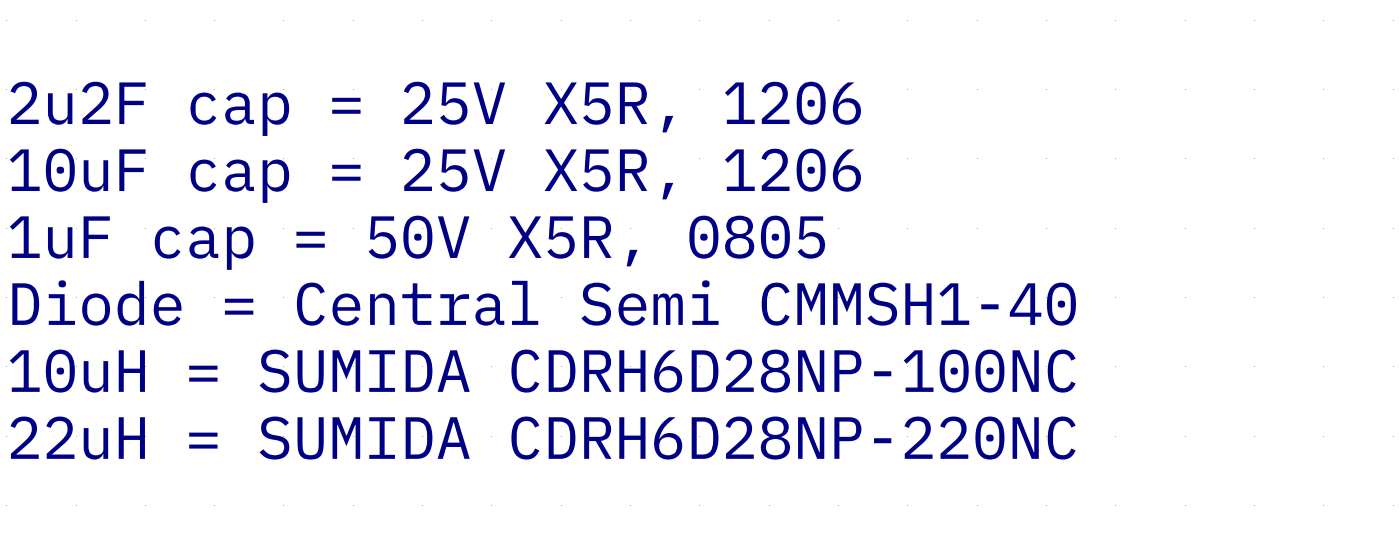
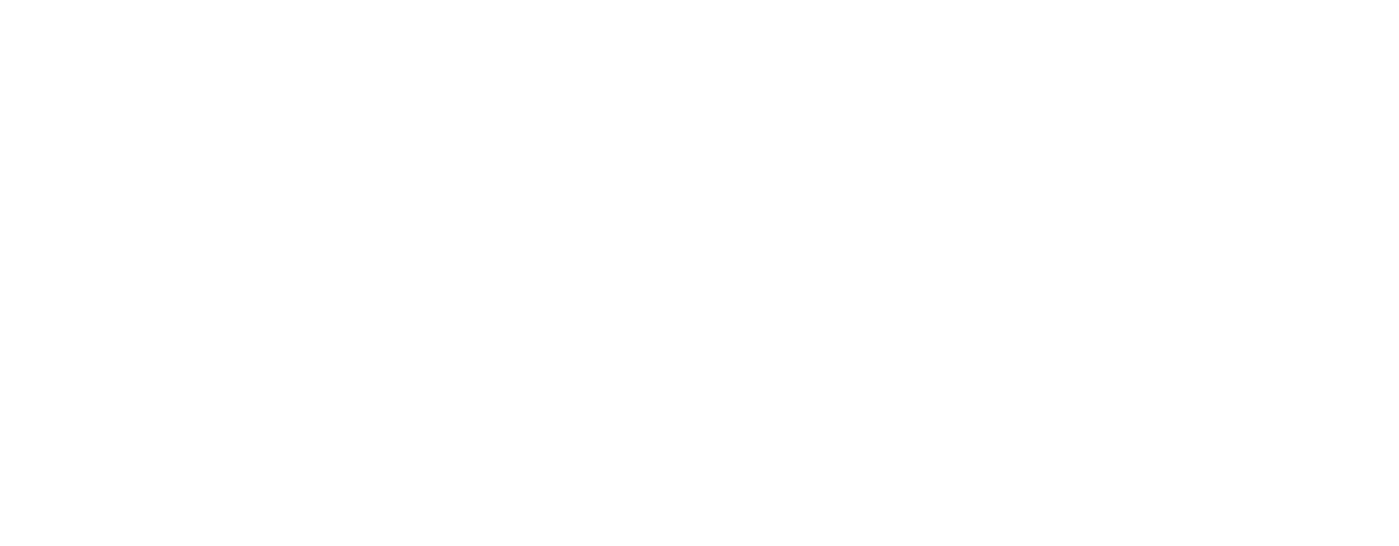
text: 2u2F cap = 25V X5R, 1206 (435, 108) -> none
text: 10uF cap = 25V X5R, 1206 (435, 175) -> none
text: 1uF cap = 50V X5R, 0805 (417, 242) -> none
text: Diode = Central Semi CMMSH1-40 (544, 302) -> none
text: 10uH = SUMIDA CDRH6D28NP-100NC (542, 371) -> none
text: 22uH = SUMIDA CDRH6D28NP-220NC (543, 438) -> none

